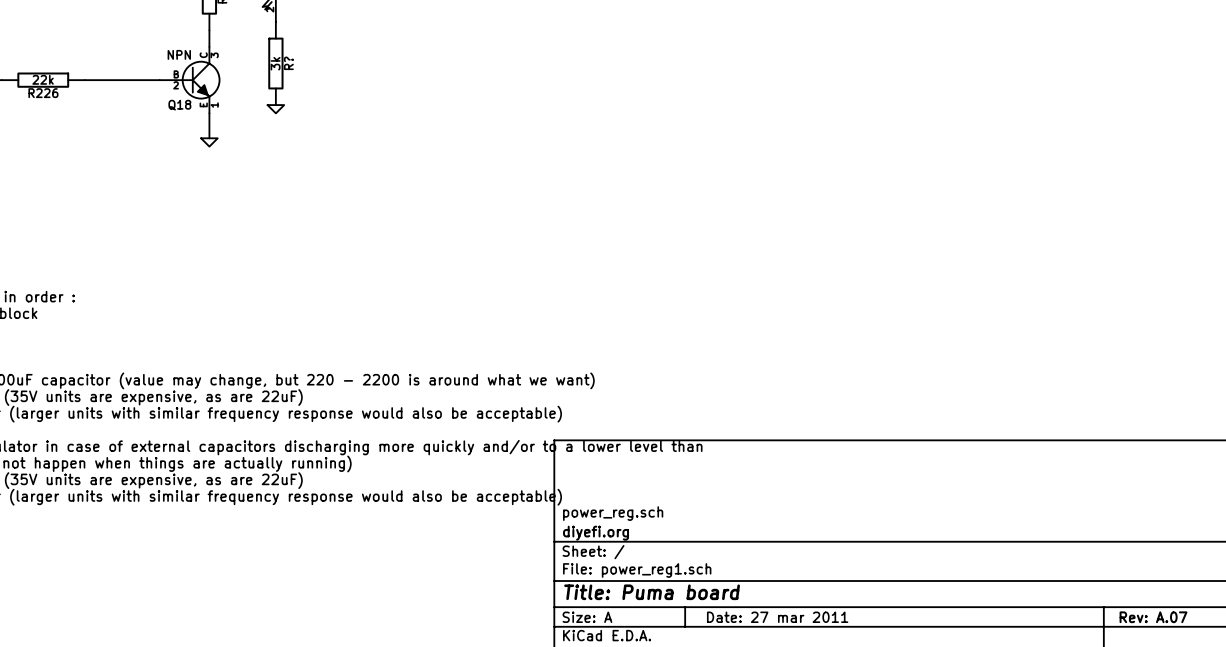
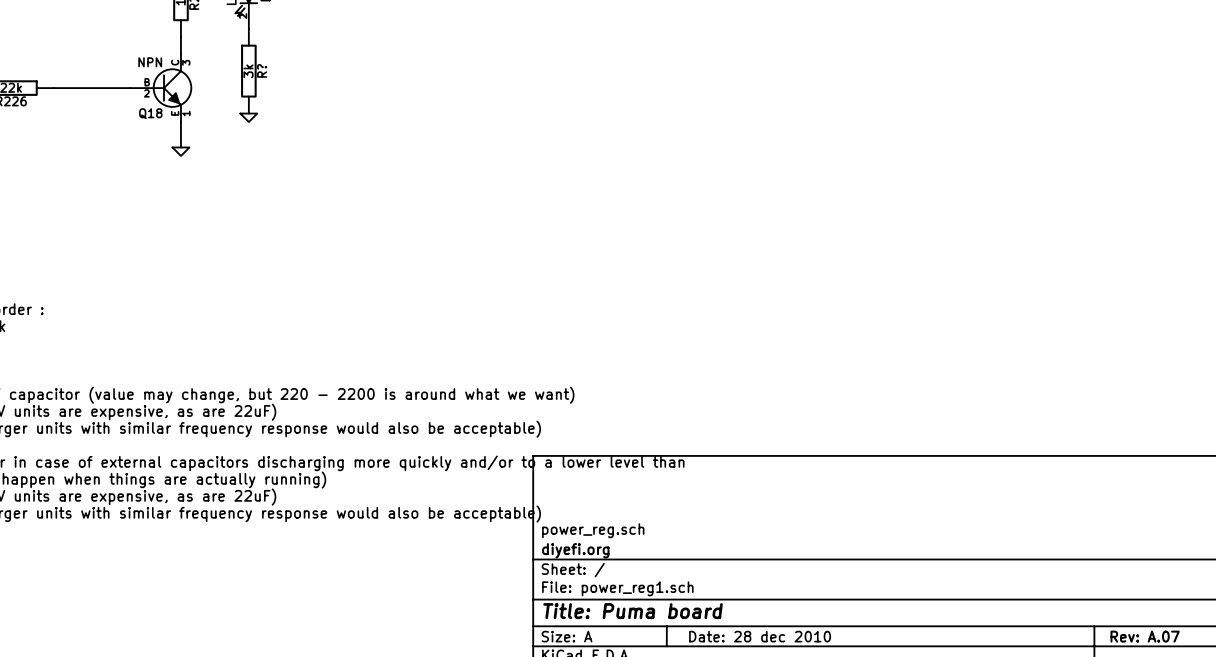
title block: Date: 27 mar 2011 (777, 617) -> Date: 28 dec 2010 (760, 636)

